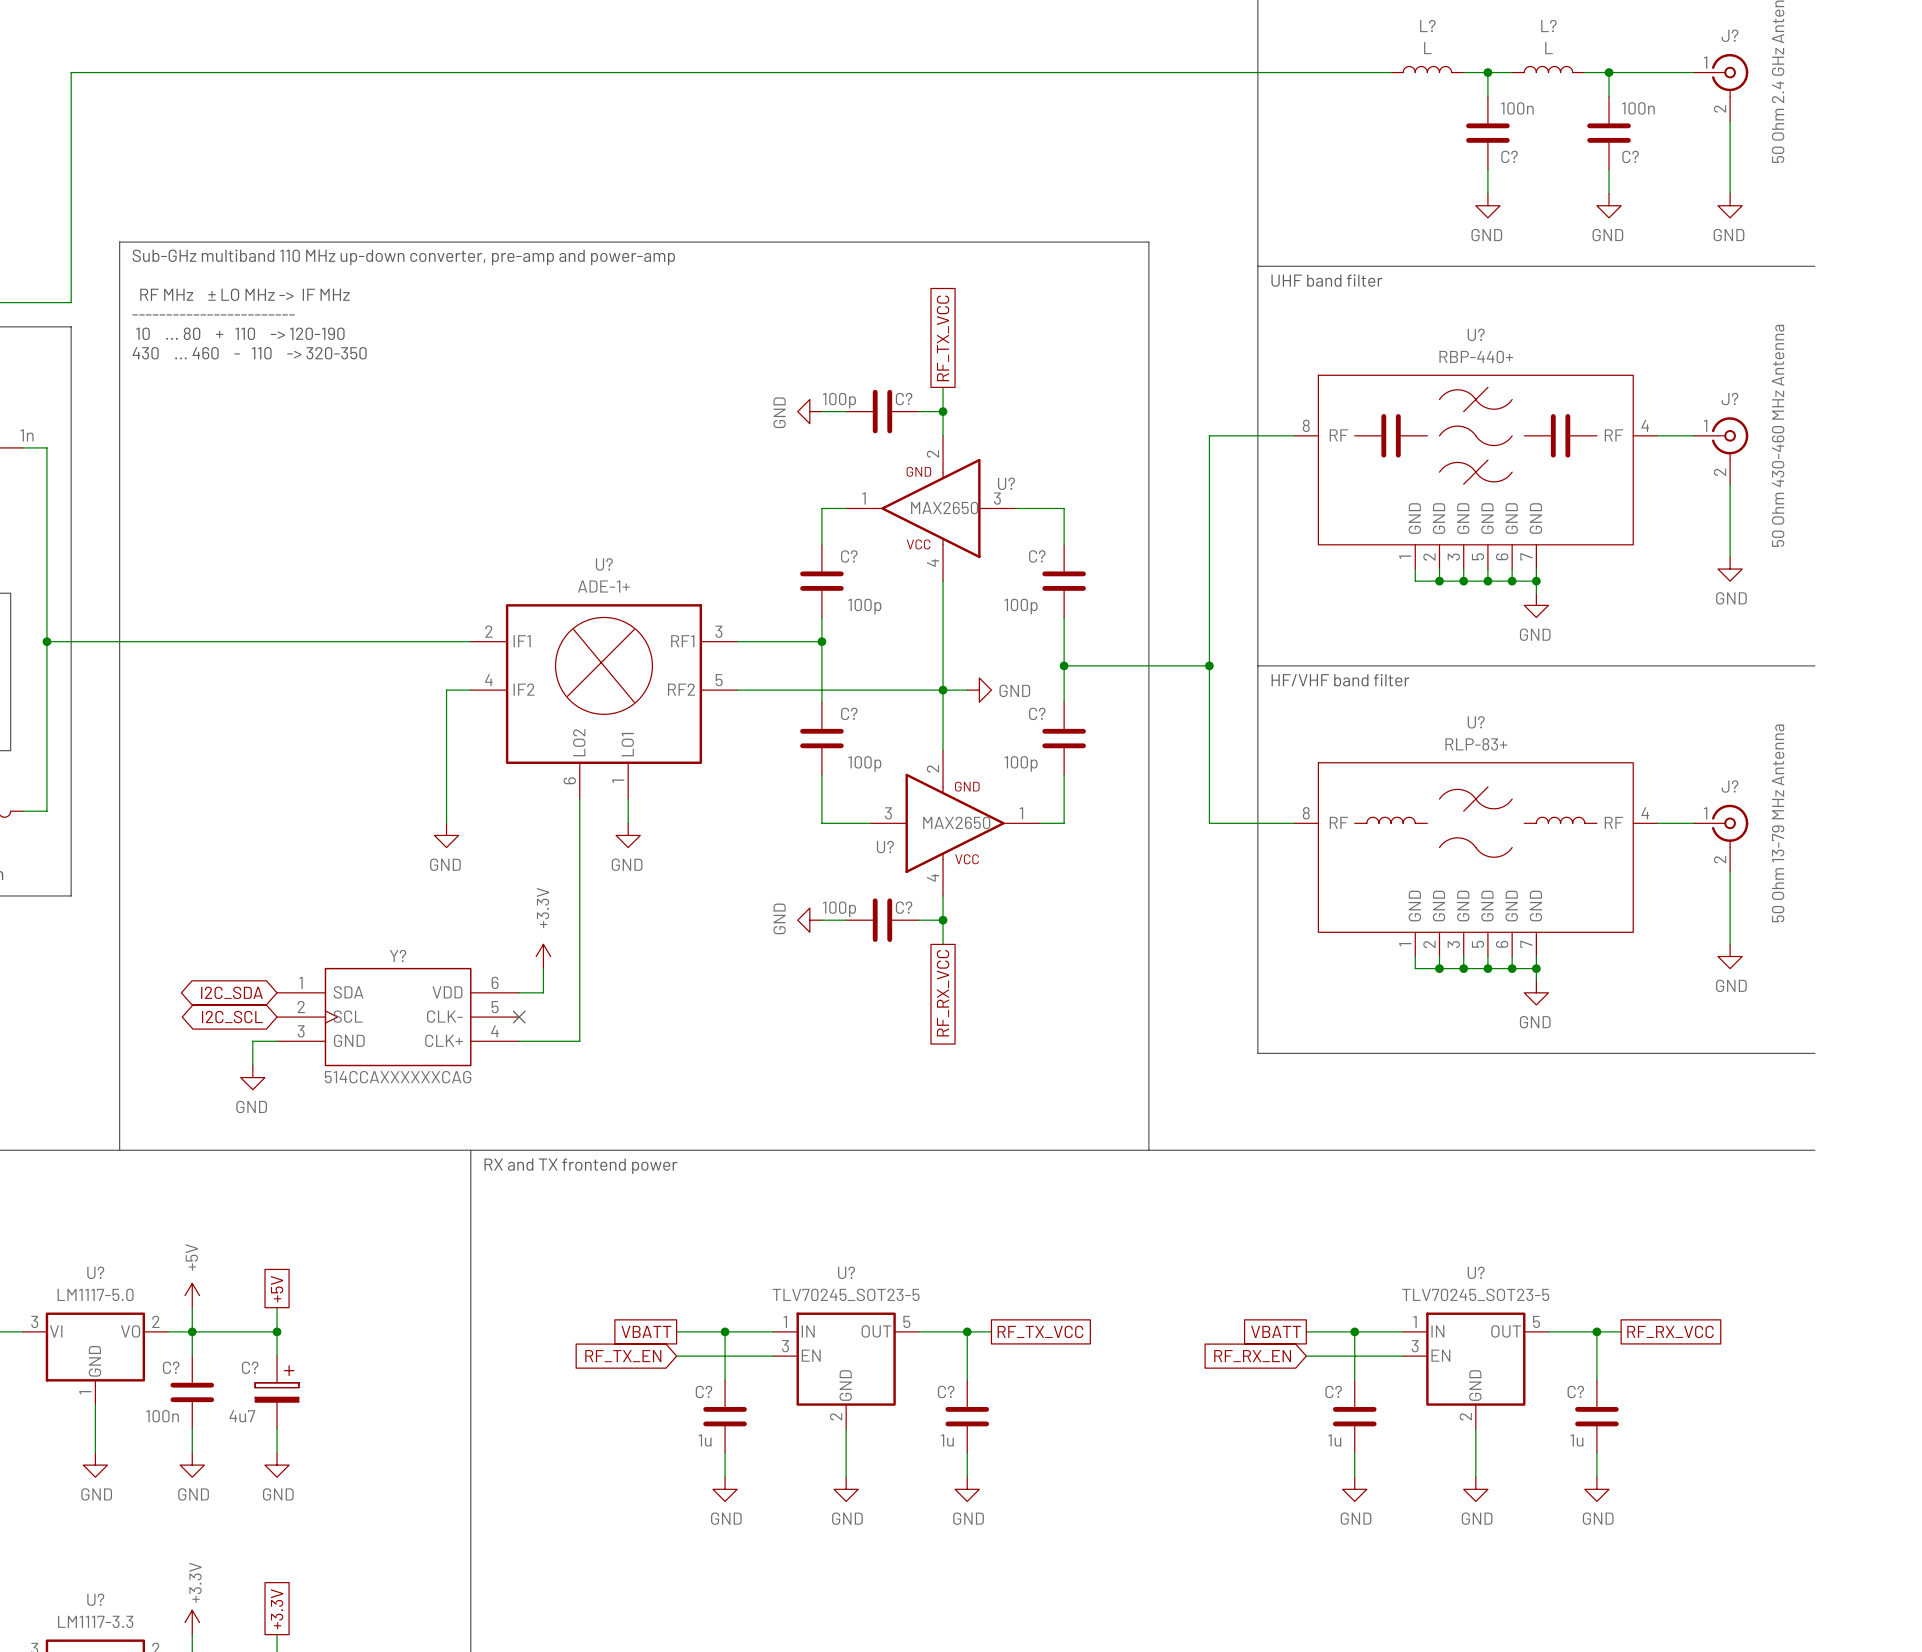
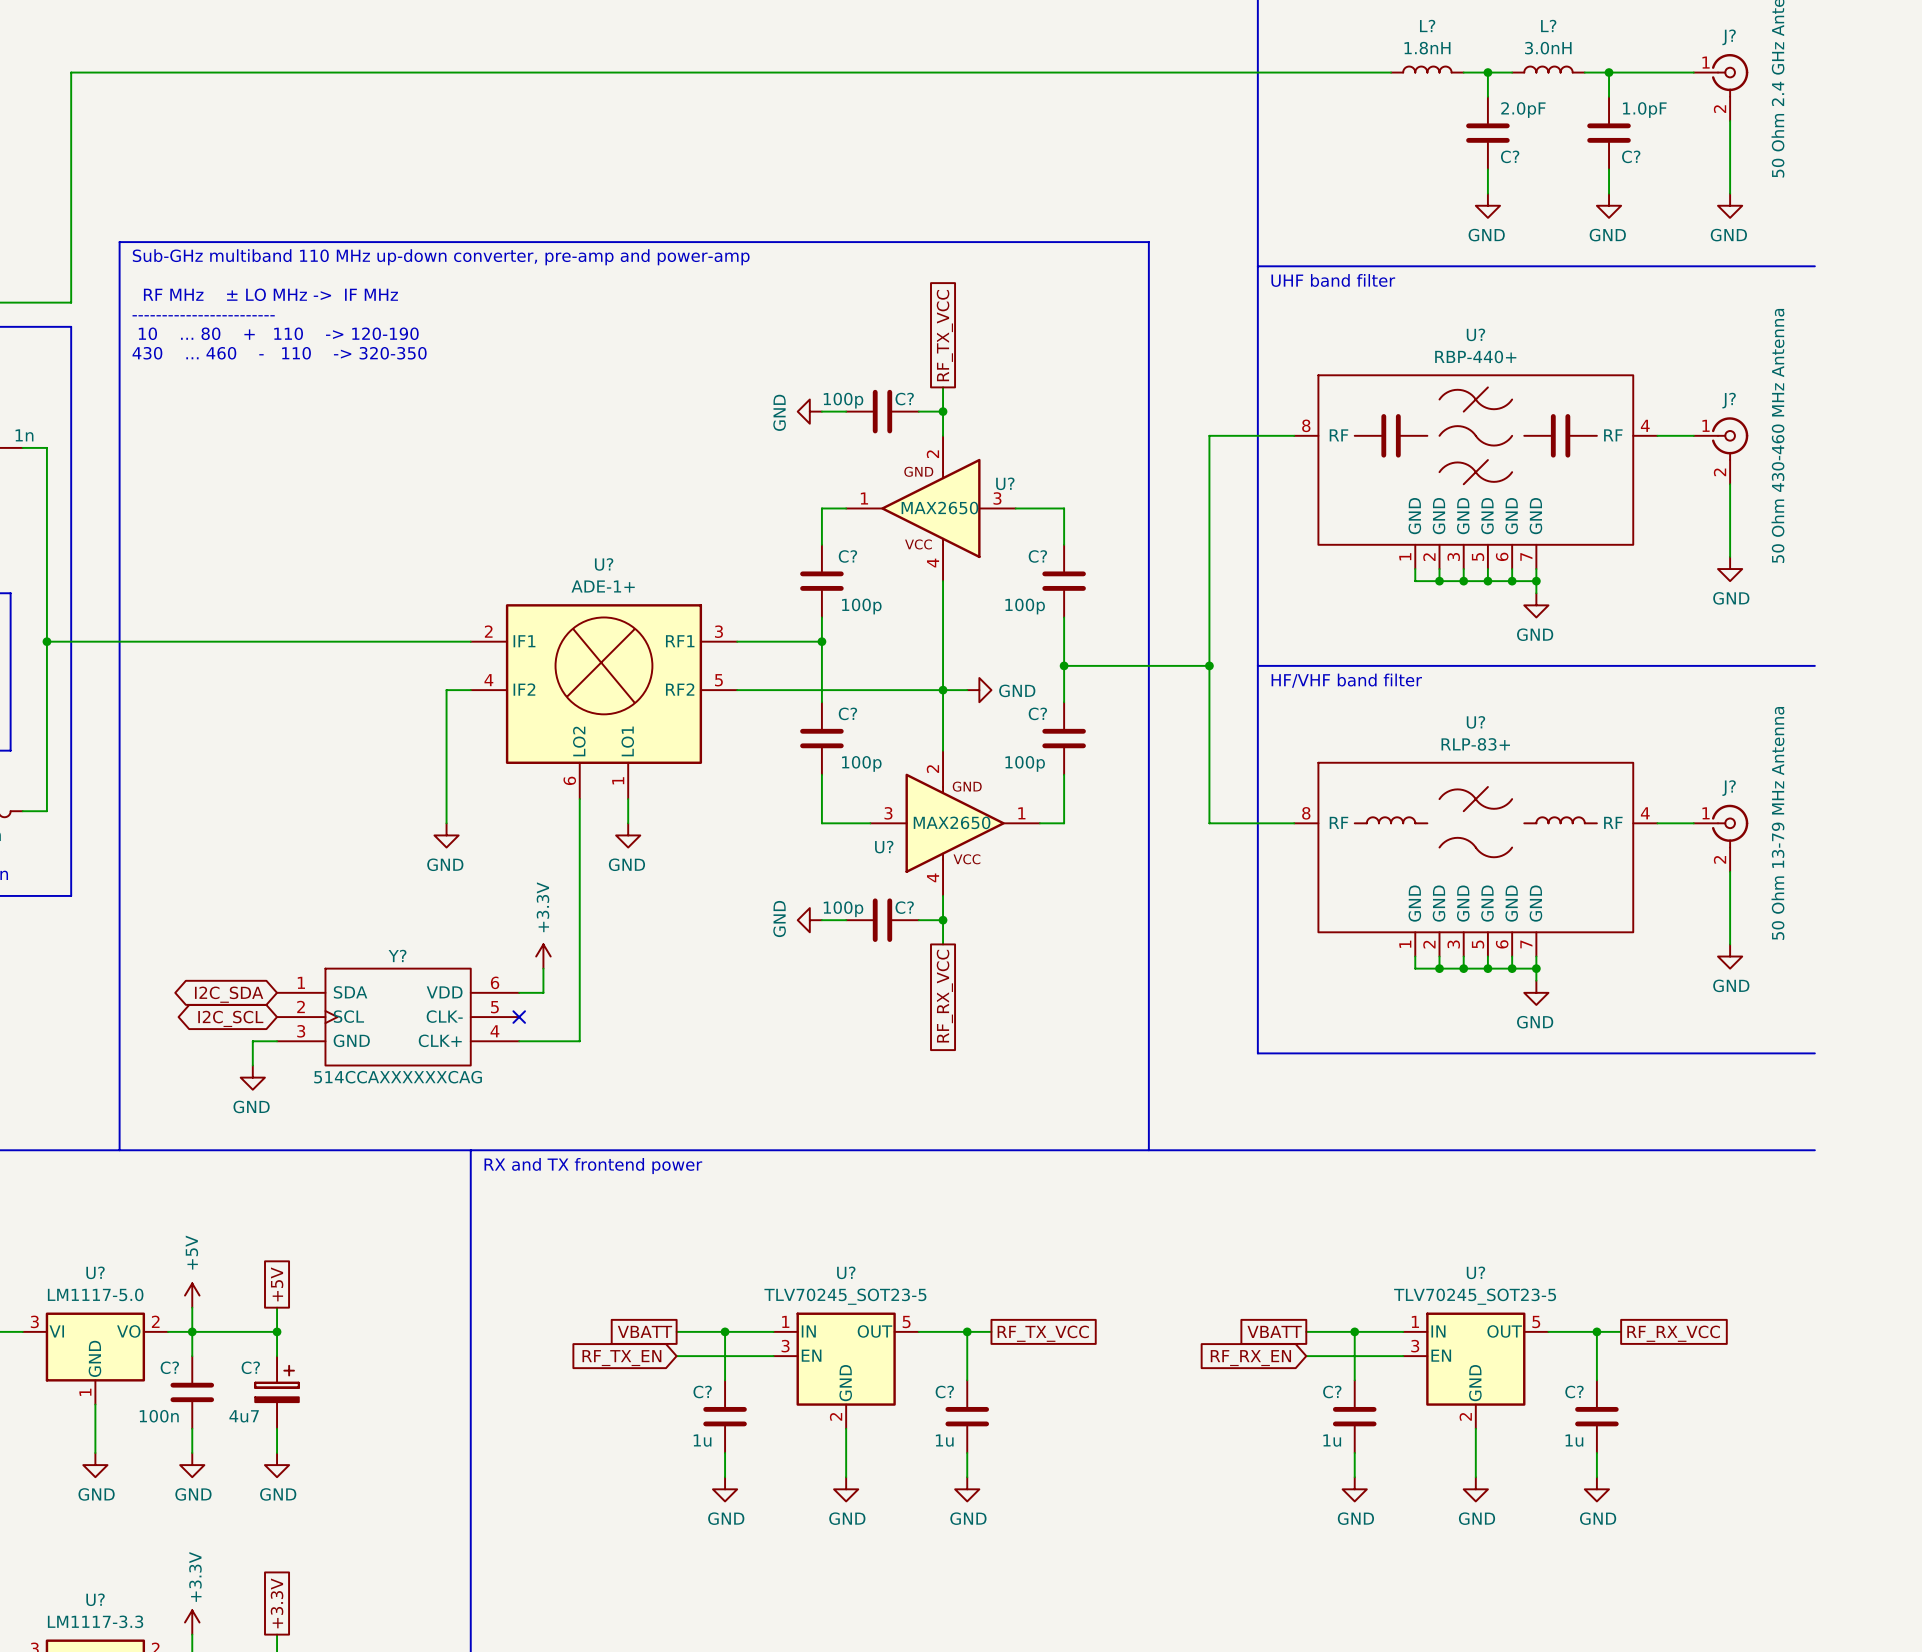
L? value: L (1427, 48) -> 1.8nH (1427, 48)
L? value: L (1548, 48) -> 3.0nH (1548, 48)
C? value: 100n (1517, 108) -> 2.0pF (1523, 110)
C? value: 100n (1638, 108) -> 1.0pF (1644, 110)

